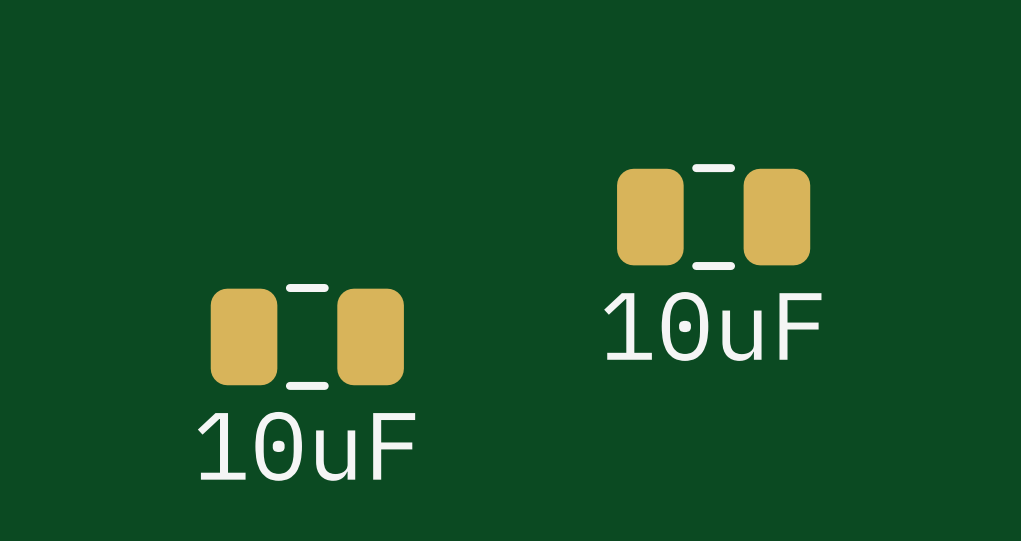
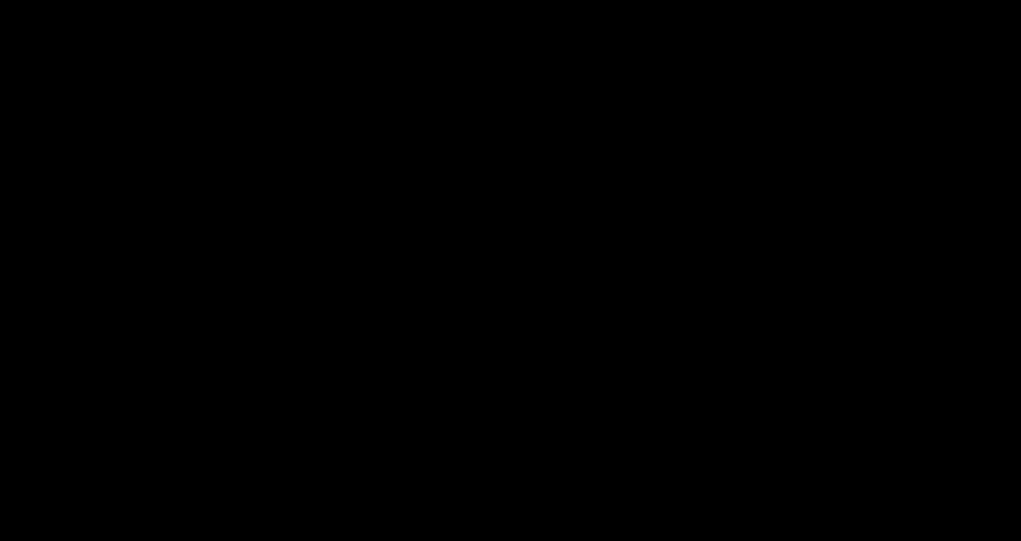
part: 10uF (713, 217) -> none
part: 10uF (307, 336) -> none

